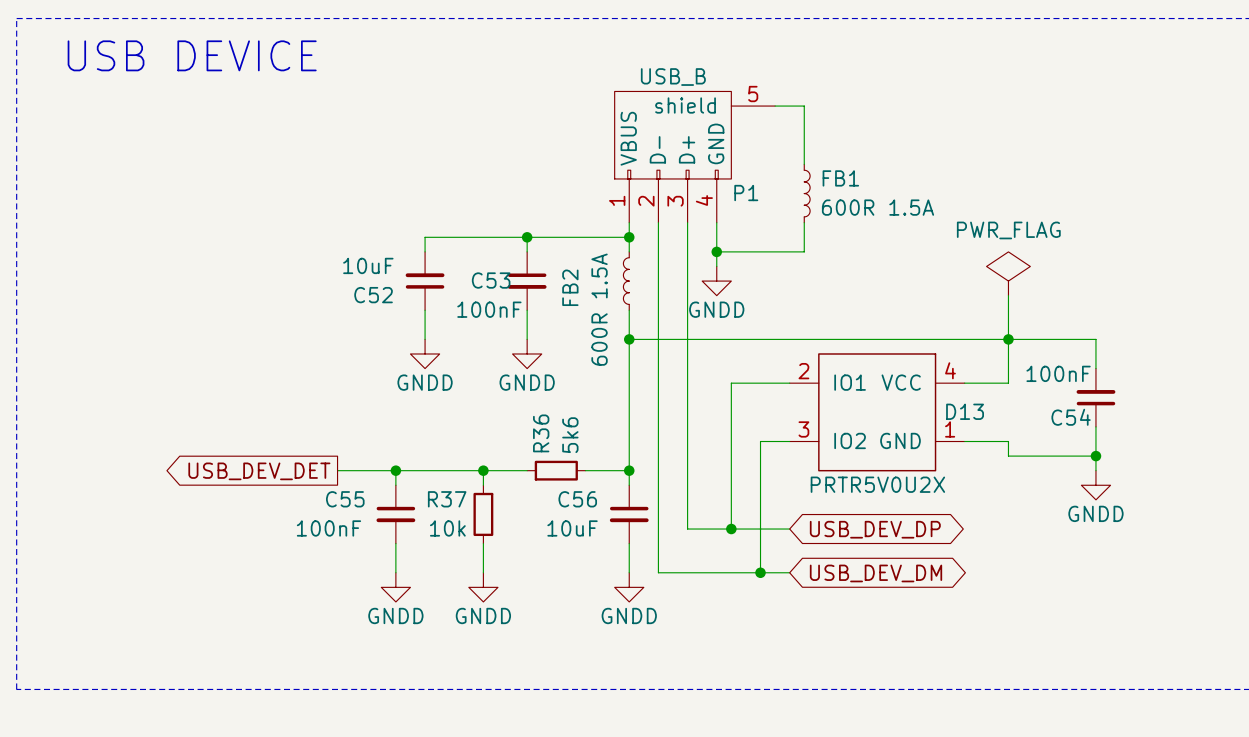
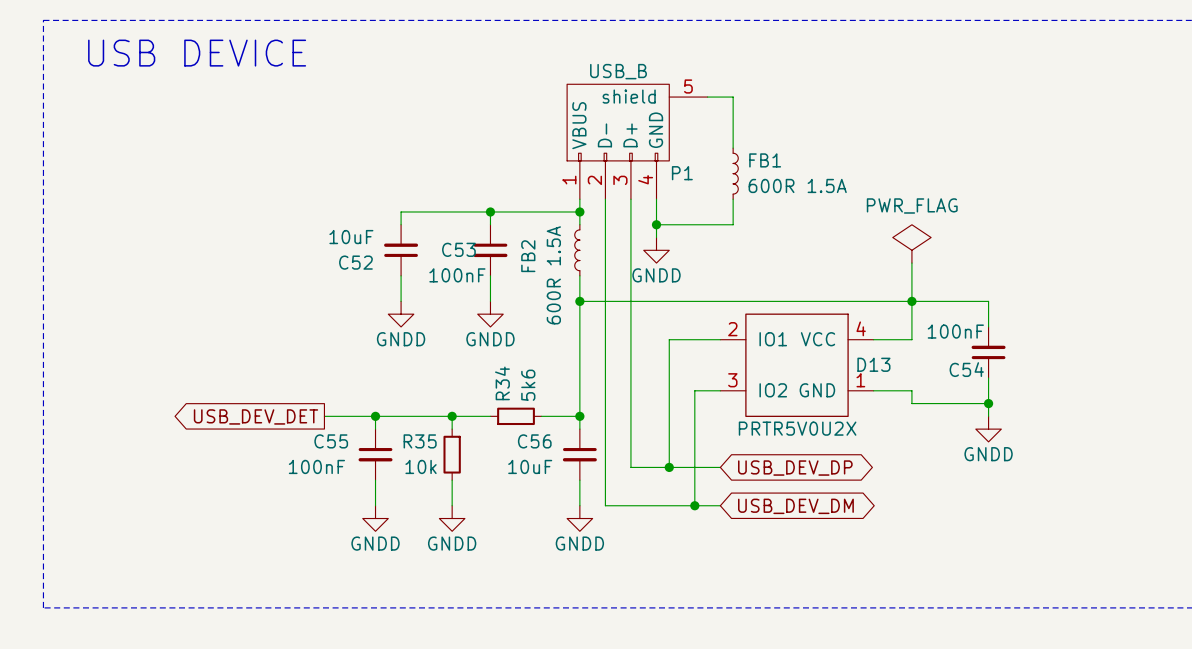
R36 name: R36 (541, 433) -> R34 (502, 383)
R37 name: R37 (447, 499) -> R35 (420, 441)

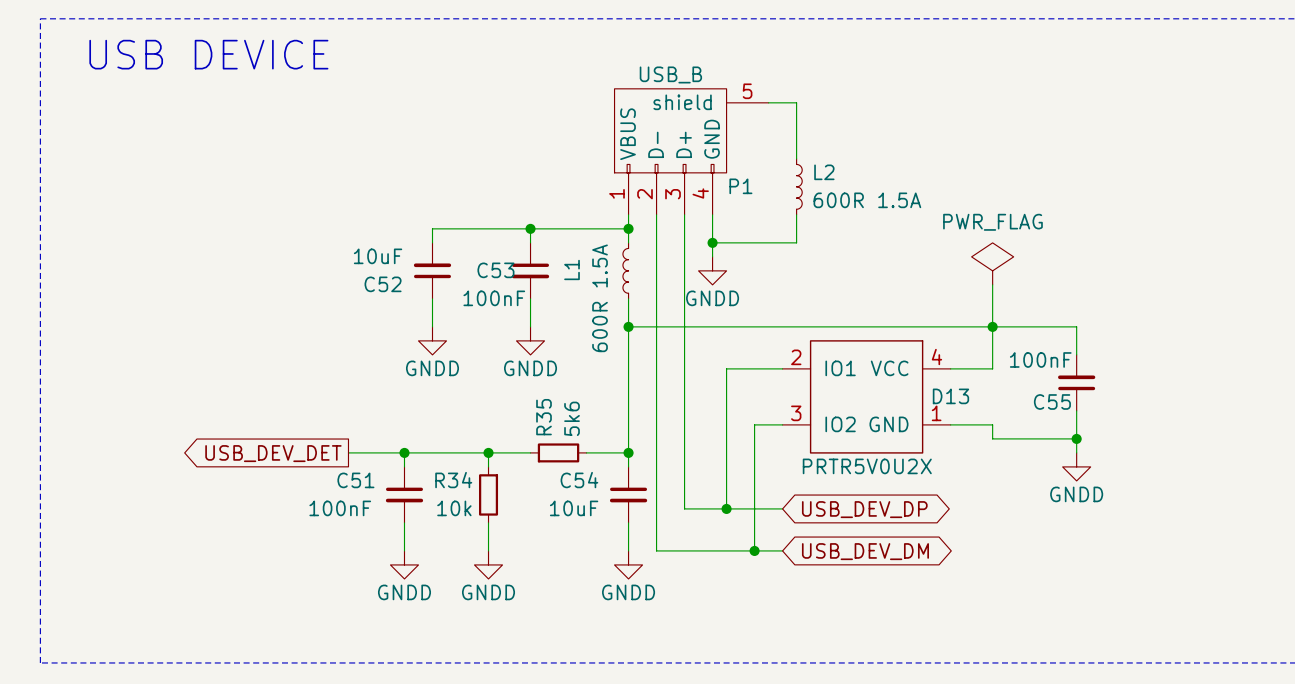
FB1 name: FB1 (765, 160) -> L2 (824, 172)
FB2 name: FB2 (528, 256) -> L1 (572, 269)
C54 name: C54 (966, 369) -> C55 (1052, 401)
R34 name: R34 (502, 383) -> R35 (544, 417)
C55 name: C55 (331, 441) -> C51 (355, 480)
R35 name: R35 (420, 441) -> R34 (453, 480)
C56 name: C56 (534, 441) -> C54 (579, 480)

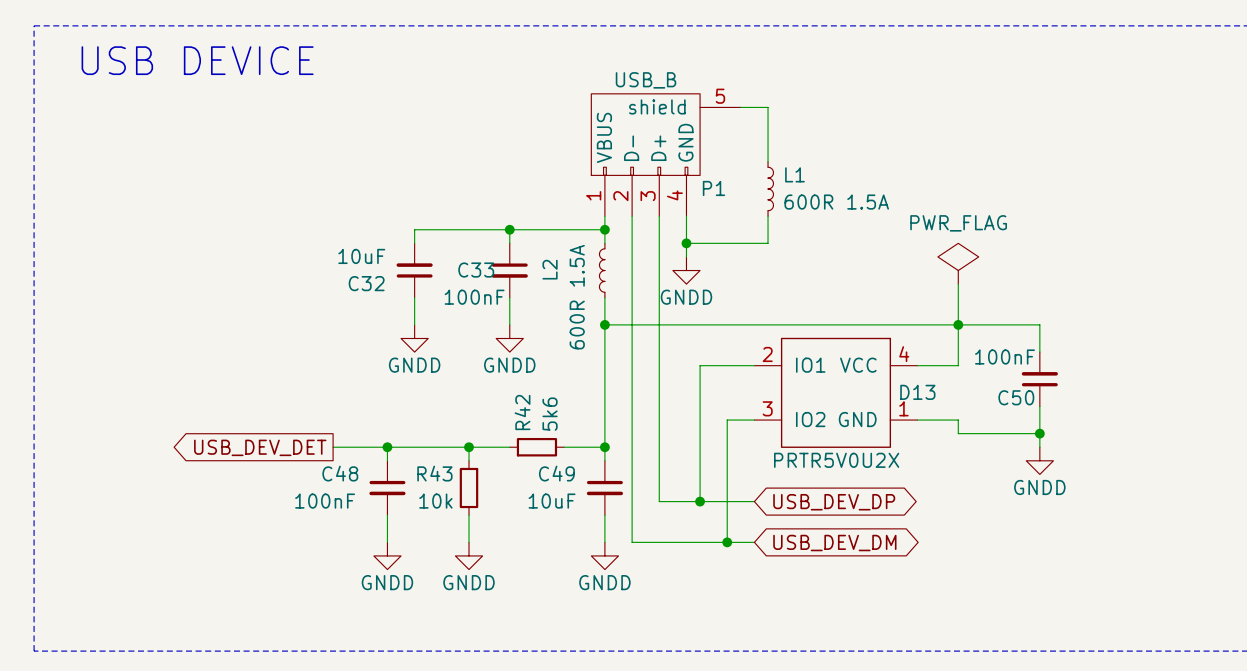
L2 name: L2 (824, 172) -> L1 (794, 174)
L1 name: L1 (572, 269) -> L2 (550, 269)
C53 name: C53 (495, 270) -> C33 (476, 270)
C52 name: C52 (383, 284) -> C32 (366, 283)
C55 name: C55 (1052, 401) -> C50 (1016, 397)
R35 name: R35 (544, 417) -> R42 (522, 412)
C51 name: C51 (355, 480) -> C48 (340, 473)
R34 name: R34 (453, 480) -> R43 (434, 473)
C54 name: C54 (579, 480) -> C49 (556, 473)

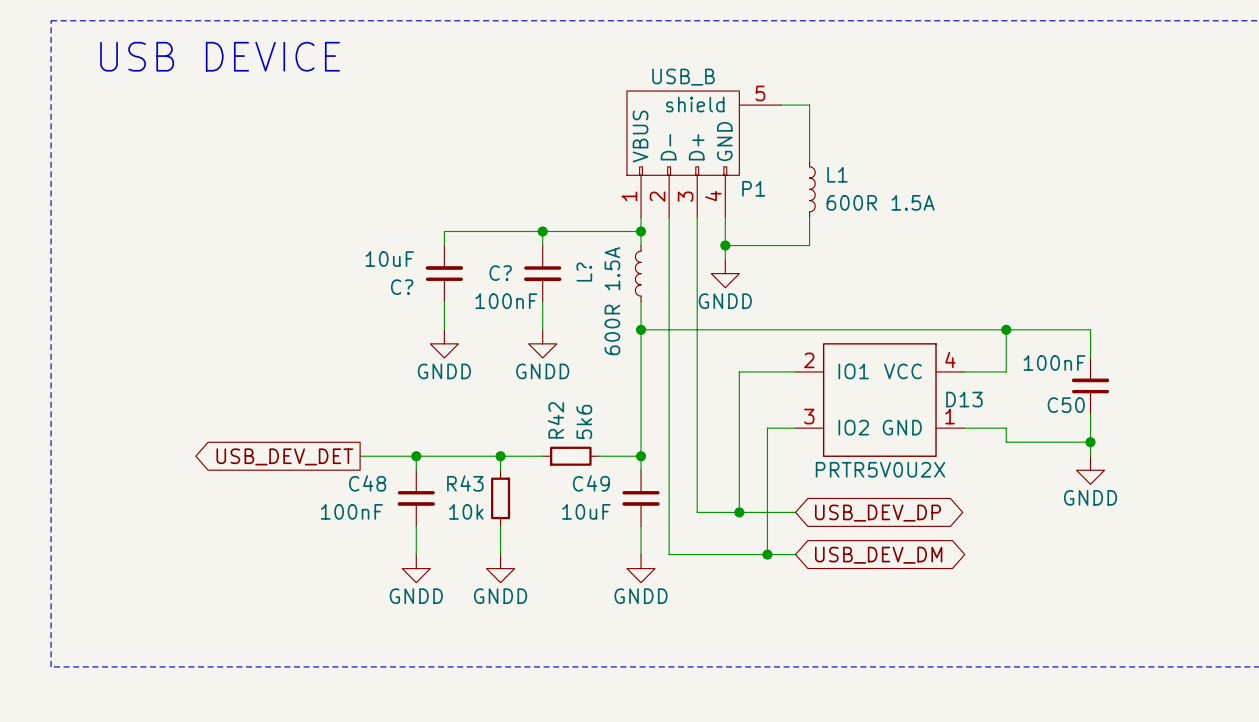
power symbol: PWR_FLAG (958, 263) -> none
L2 name: L2 (550, 269) -> L? (584, 272)
C33 name: C33 (476, 270) -> C? (500, 273)
C32 name: C32 (366, 283) -> C? (402, 287)
wire: (958, 284) (958, 324) -> none

